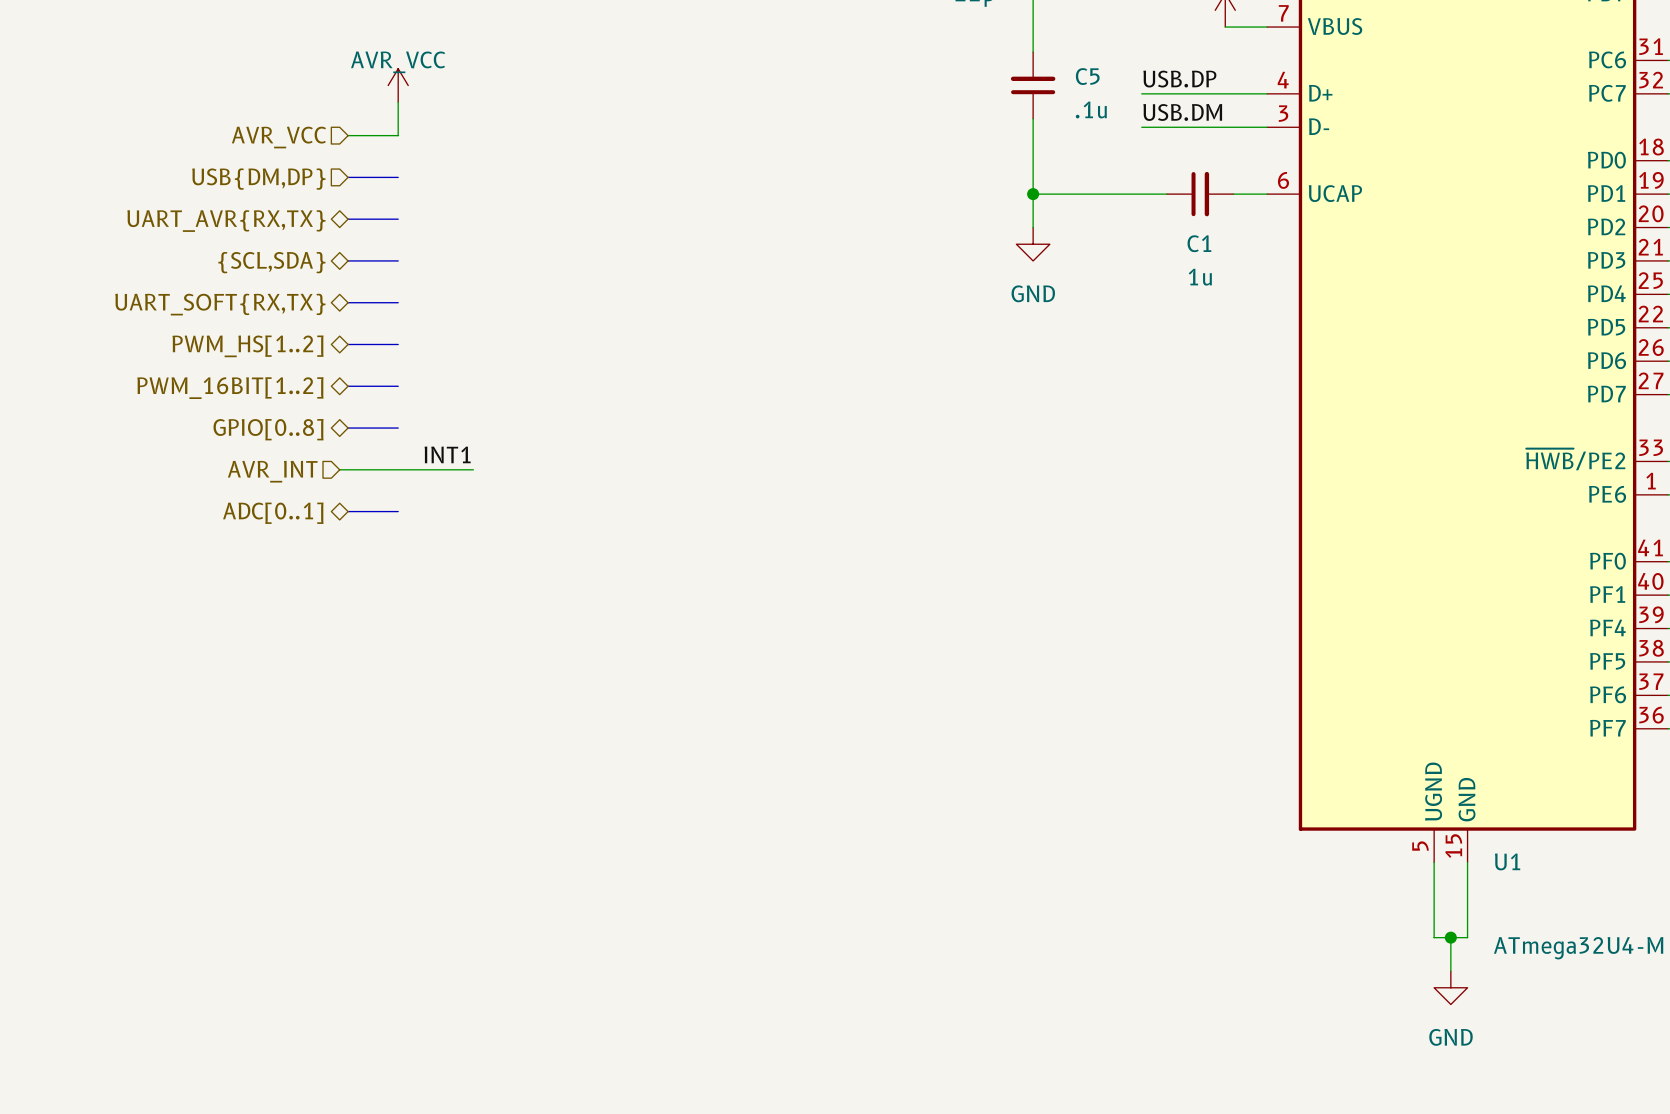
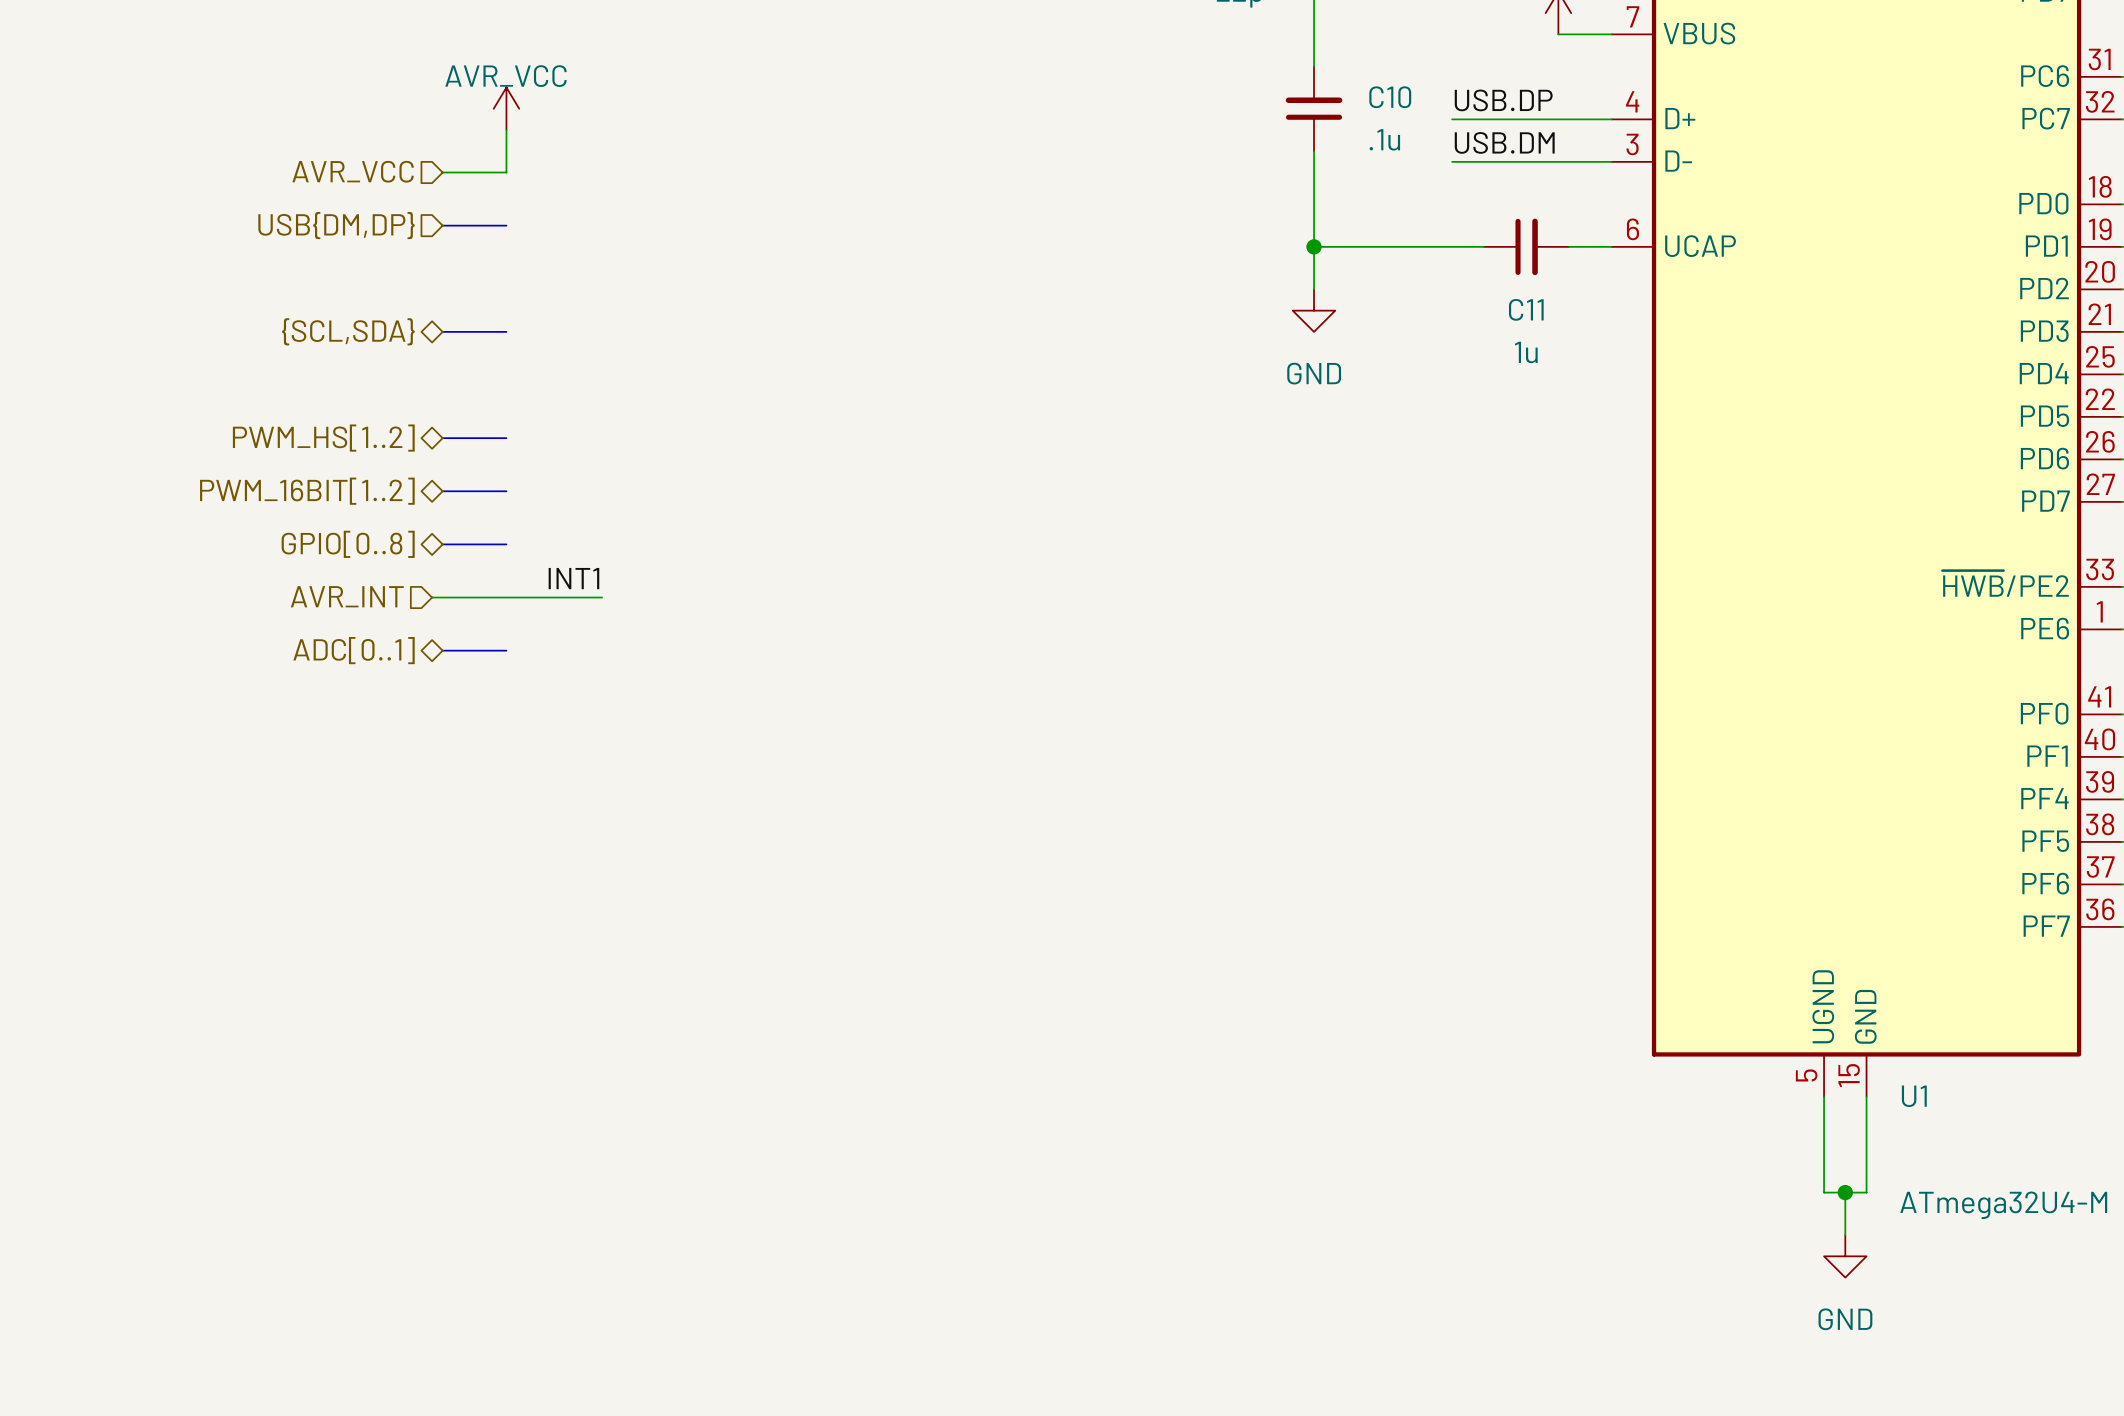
C5 name: C5 (1087, 76) -> C10 (1390, 97)
bus: (348, 219) (398, 219) -> none
hierarchical label: UART_AVR{RX,TX} (226, 221) -> none
C1 name: C1 (1199, 243) -> C11 (1526, 309)
bus: (348, 302) (398, 302) -> none
hierarchical label: UART_SOFT{RX,TX} (220, 304) -> none

